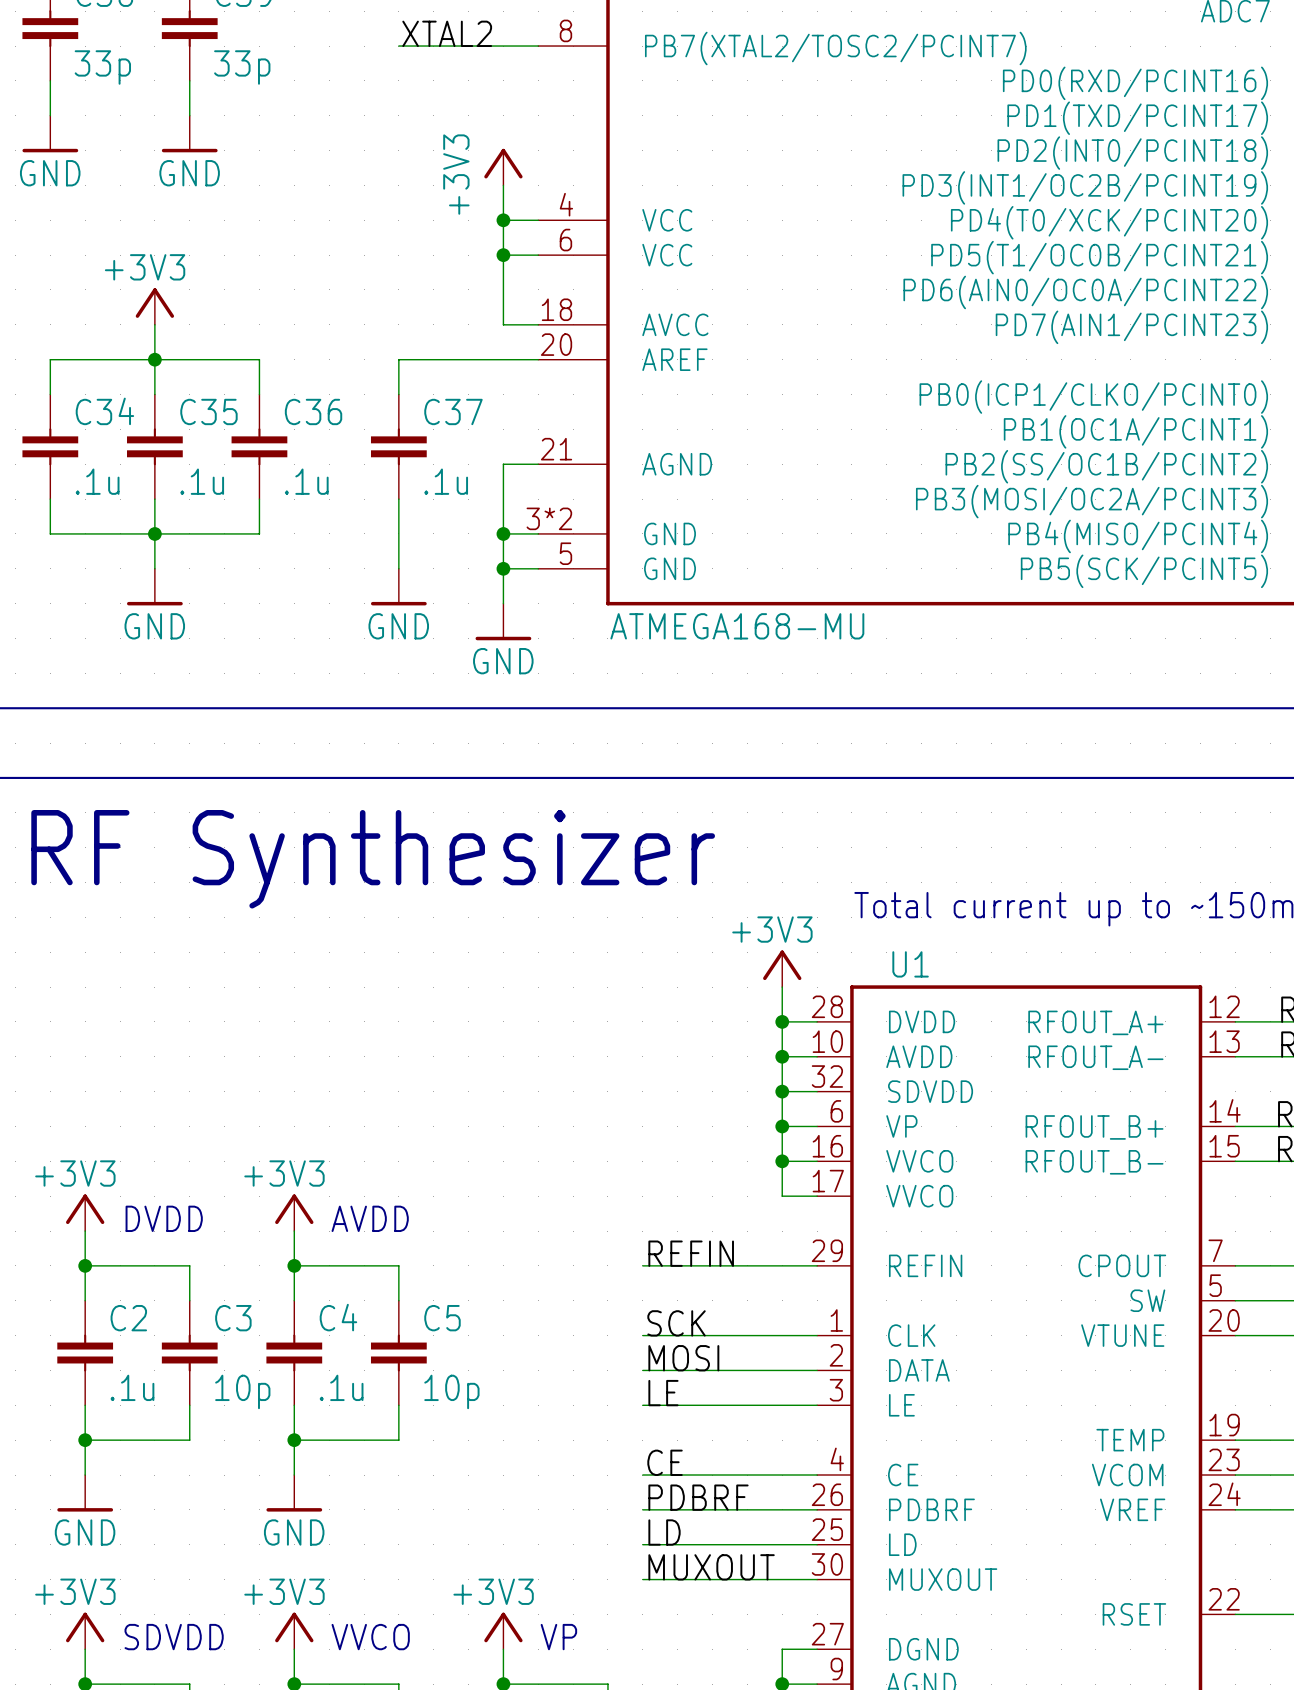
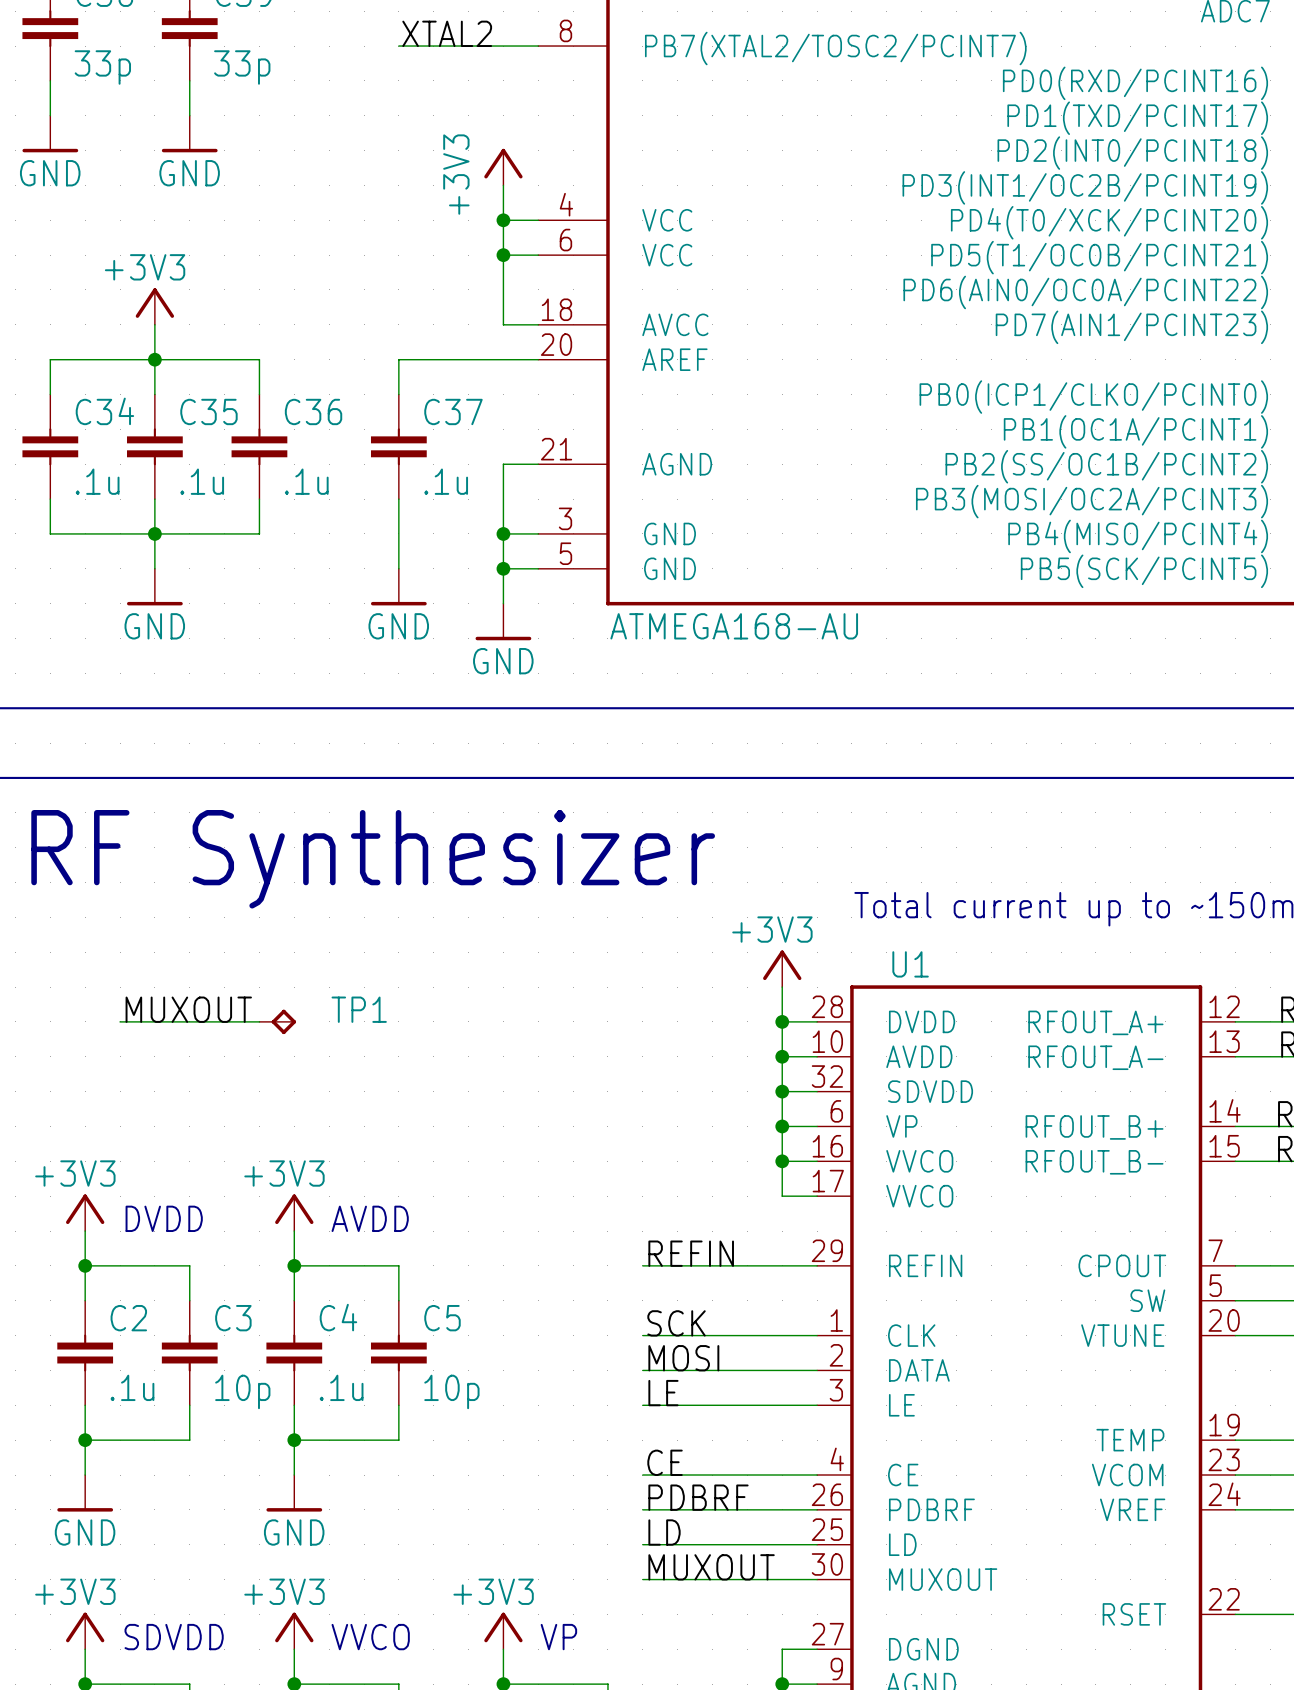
part pin number: 3*2 (549, 518) -> 3 (565, 518)
part value: ATMEGA168-MU (737, 626) -> ATMEGA168-AU (734, 626)
label: none -> MUXOUT (188, 1009)
wire: none -> (120, 1021) (259, 1021)
TP1: none -> (277, 1021)

